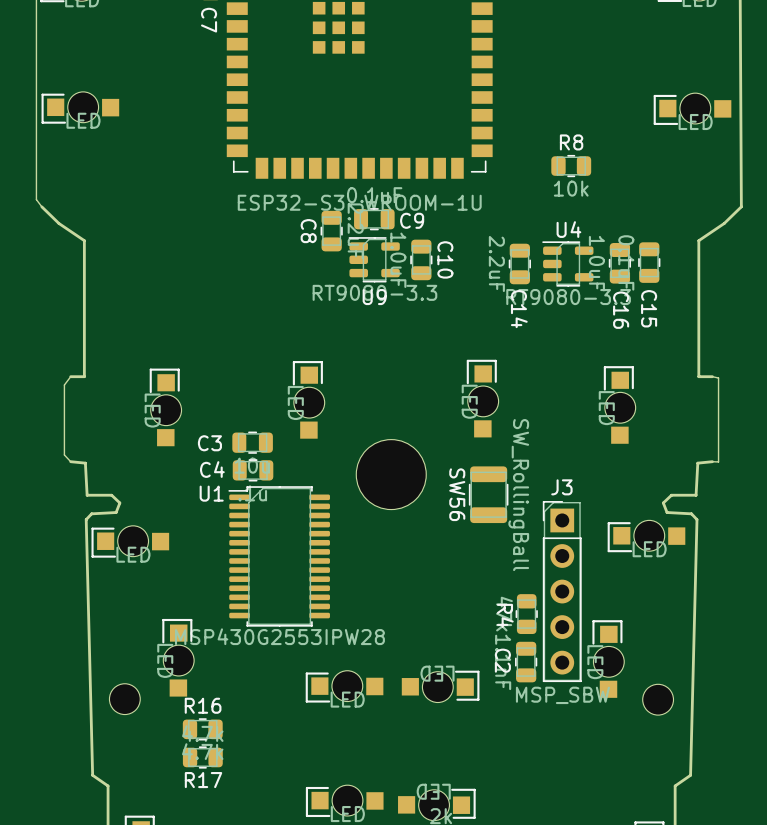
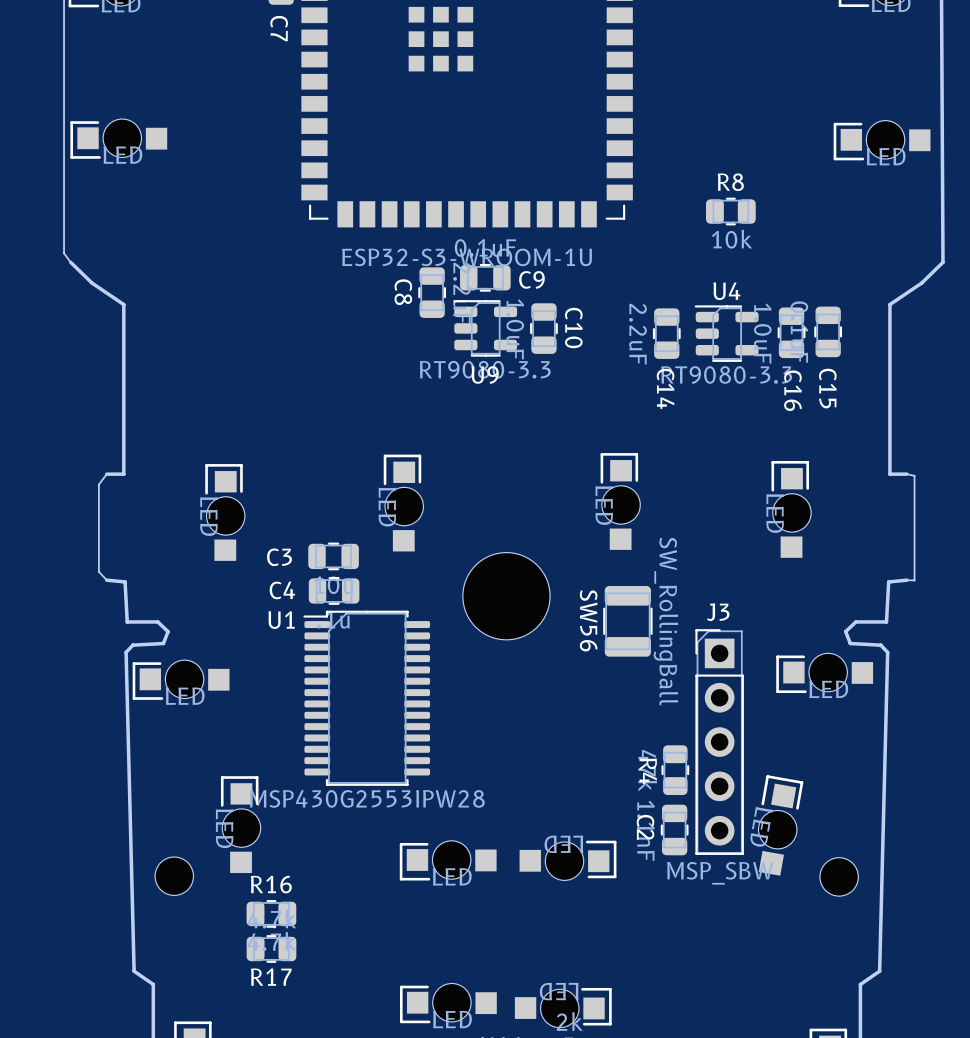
part rotation: 0° (608, 659) -> 10° clockwise (780, 825)

